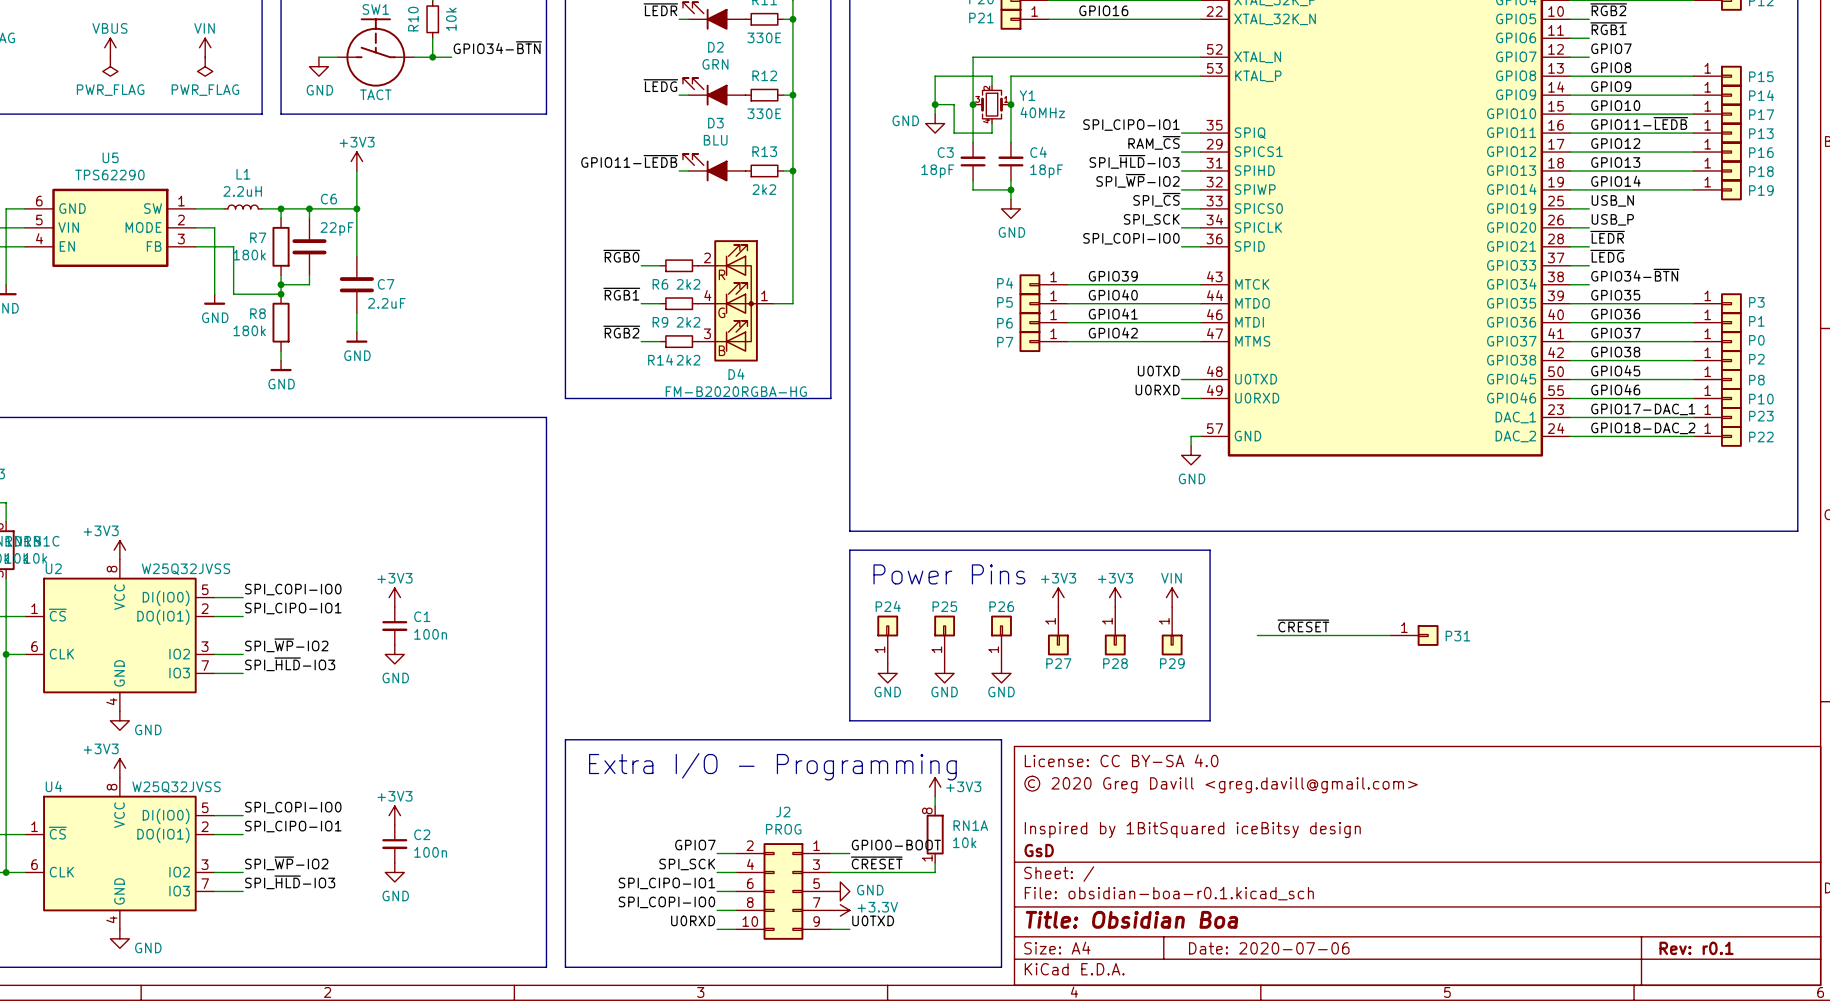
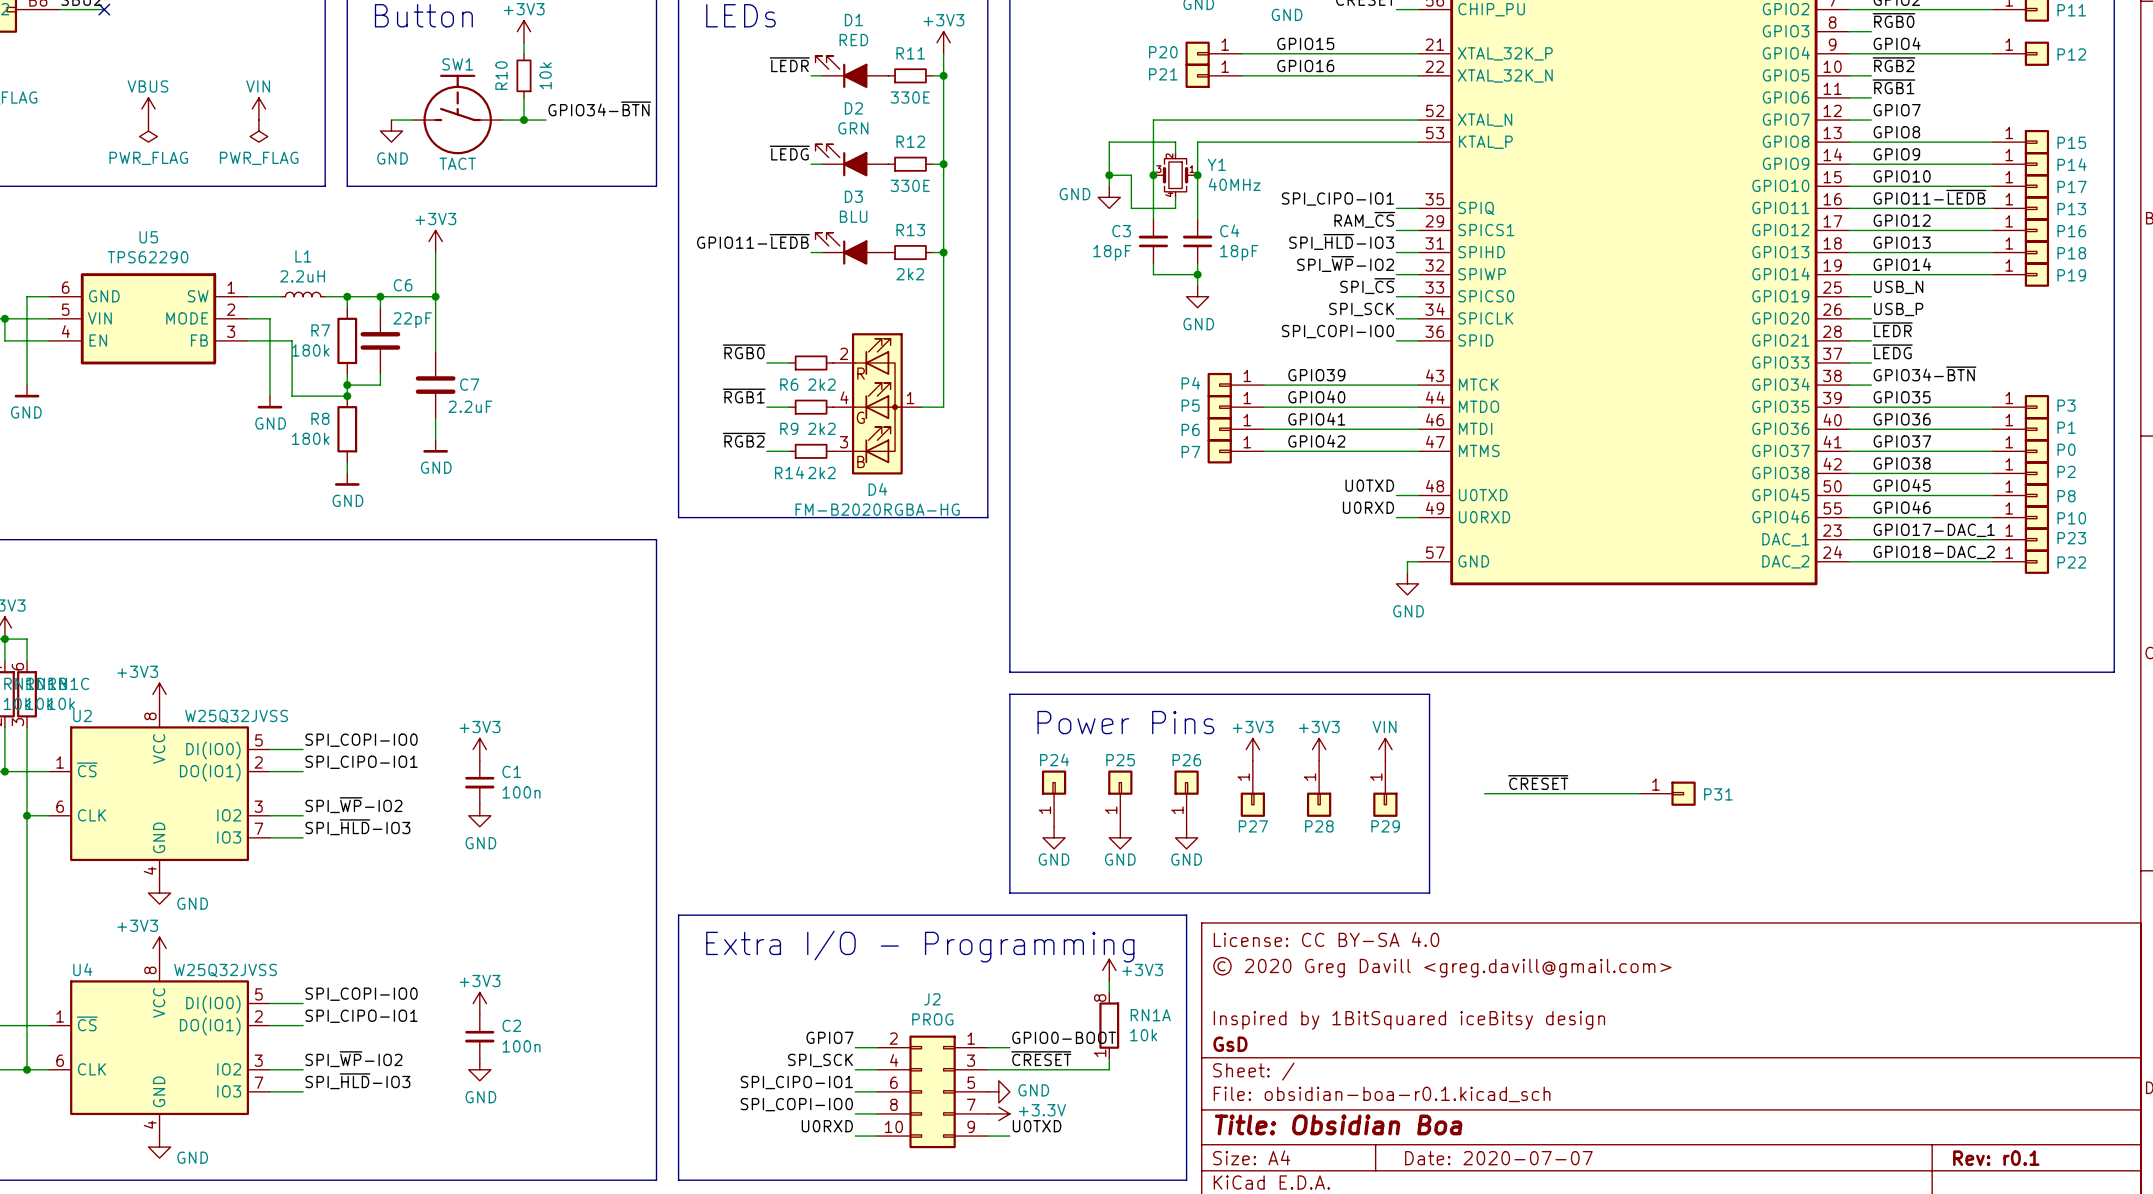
title block: Date: 2020-07-06 (1269, 948) -> Date: 2020-07-07 (1498, 1158)

